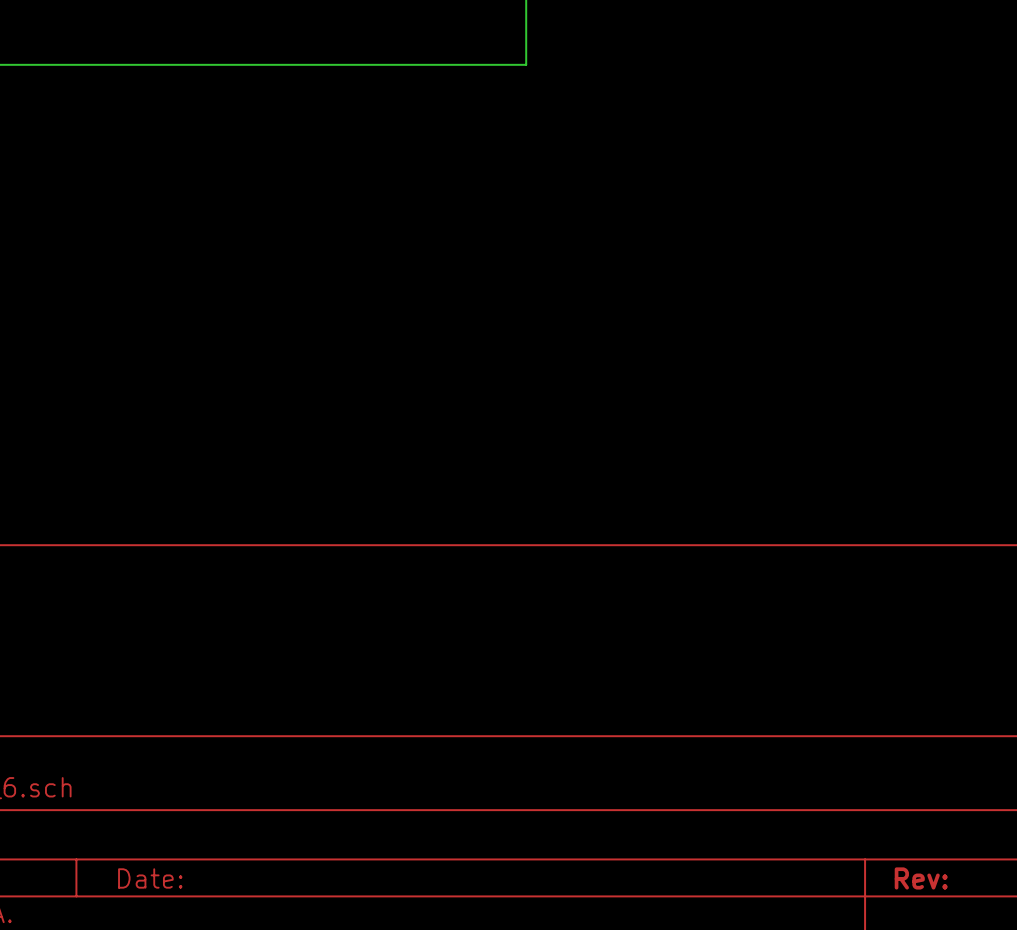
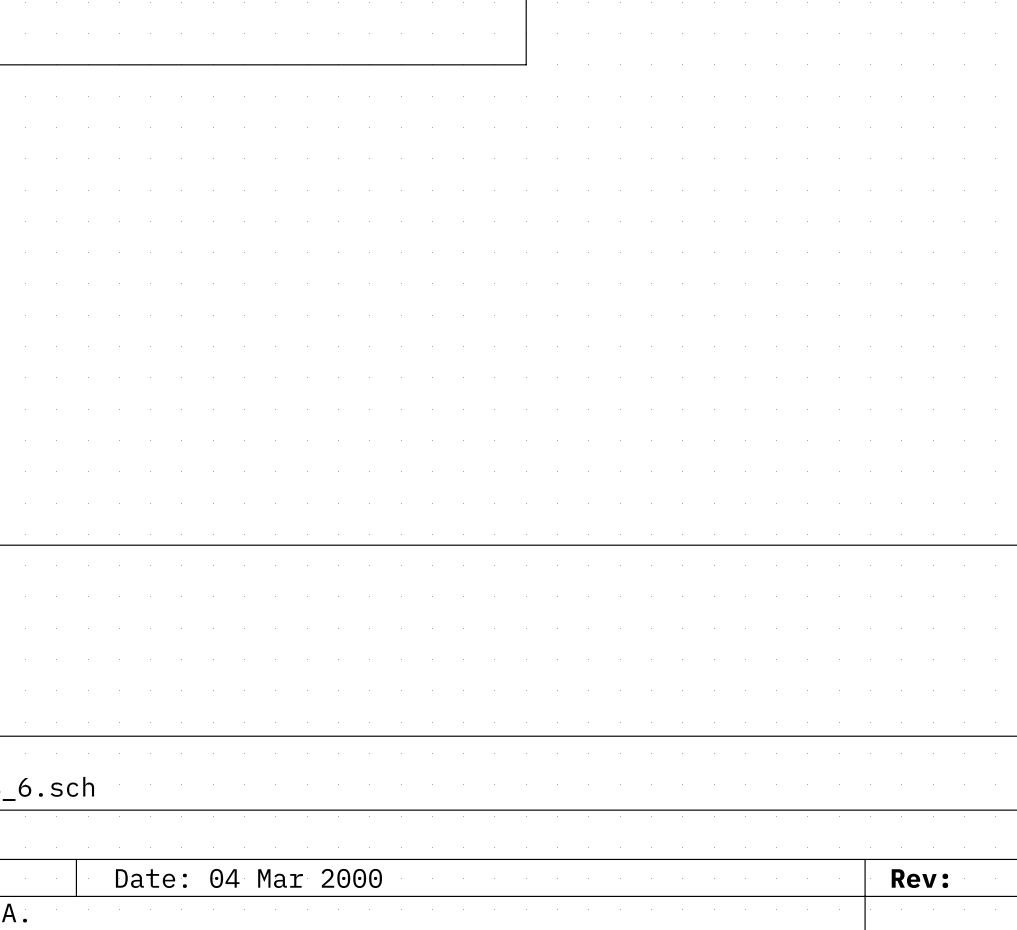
title block: Date: (150, 878) -> Date: 04 Mar 2000 (248, 878)

